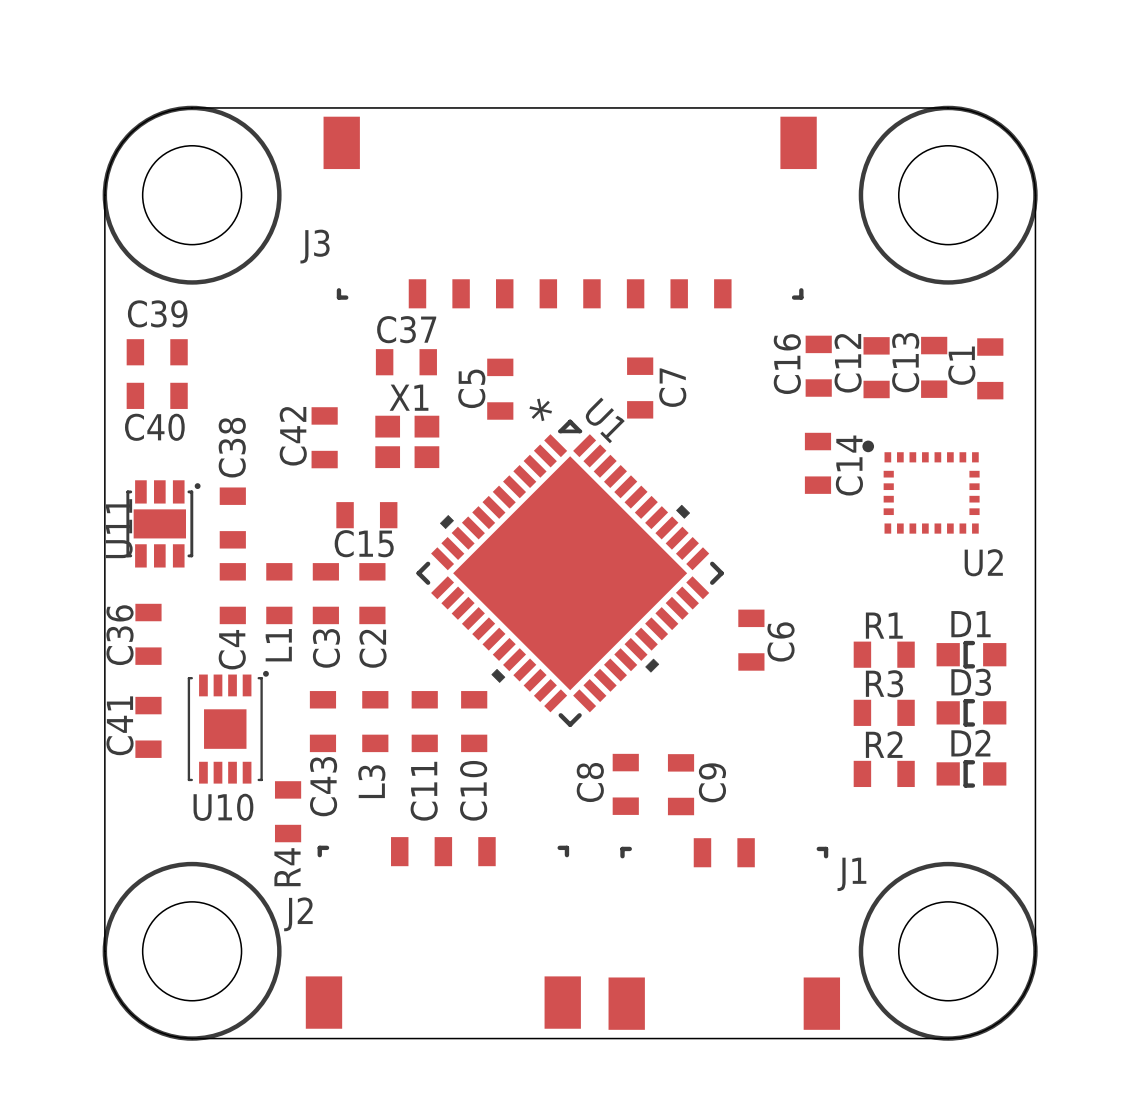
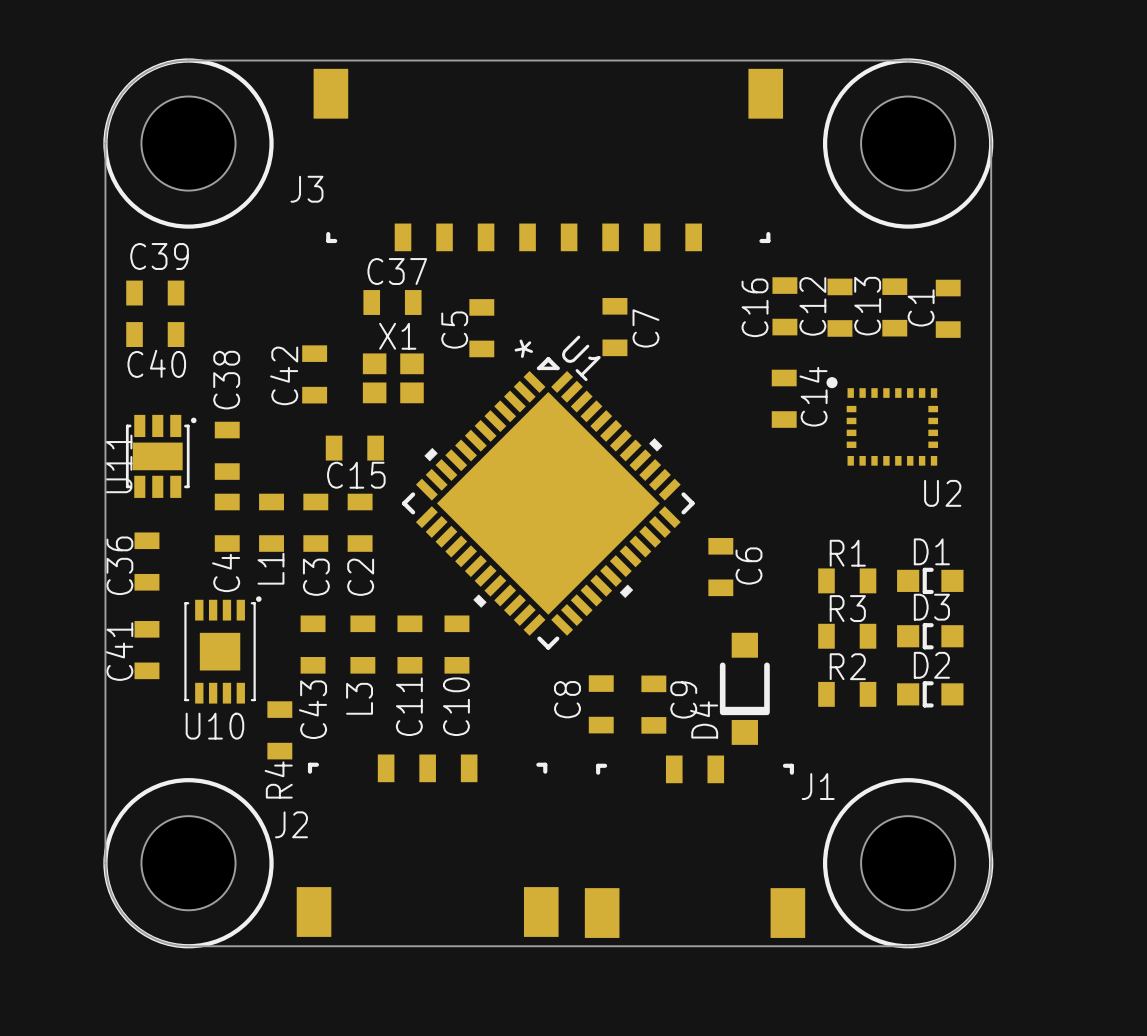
D4: none -> (744, 688)

